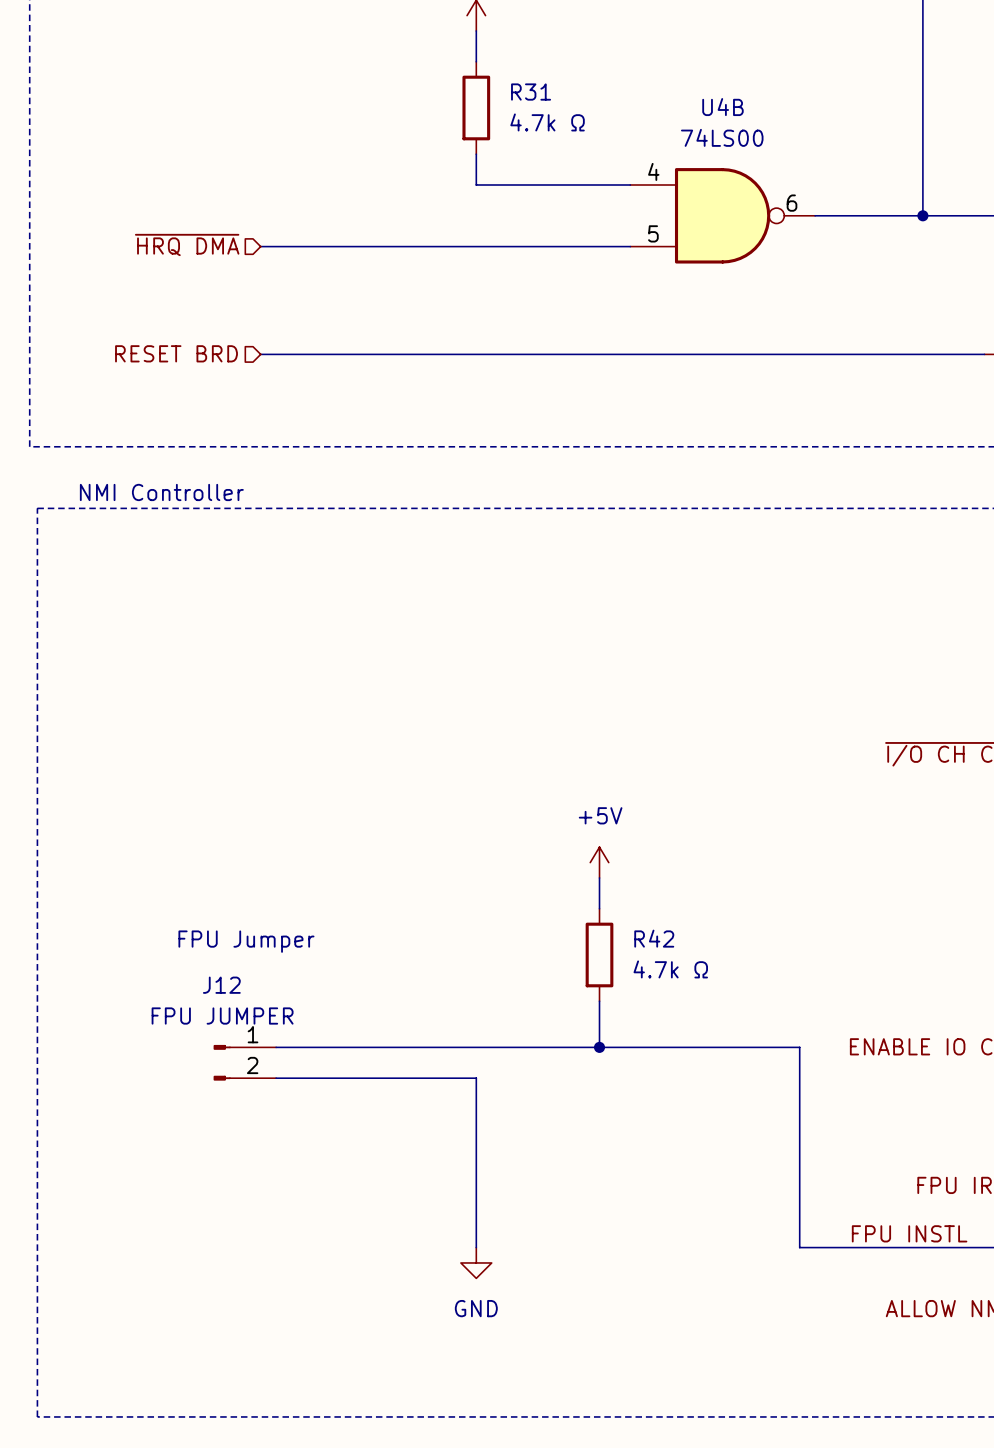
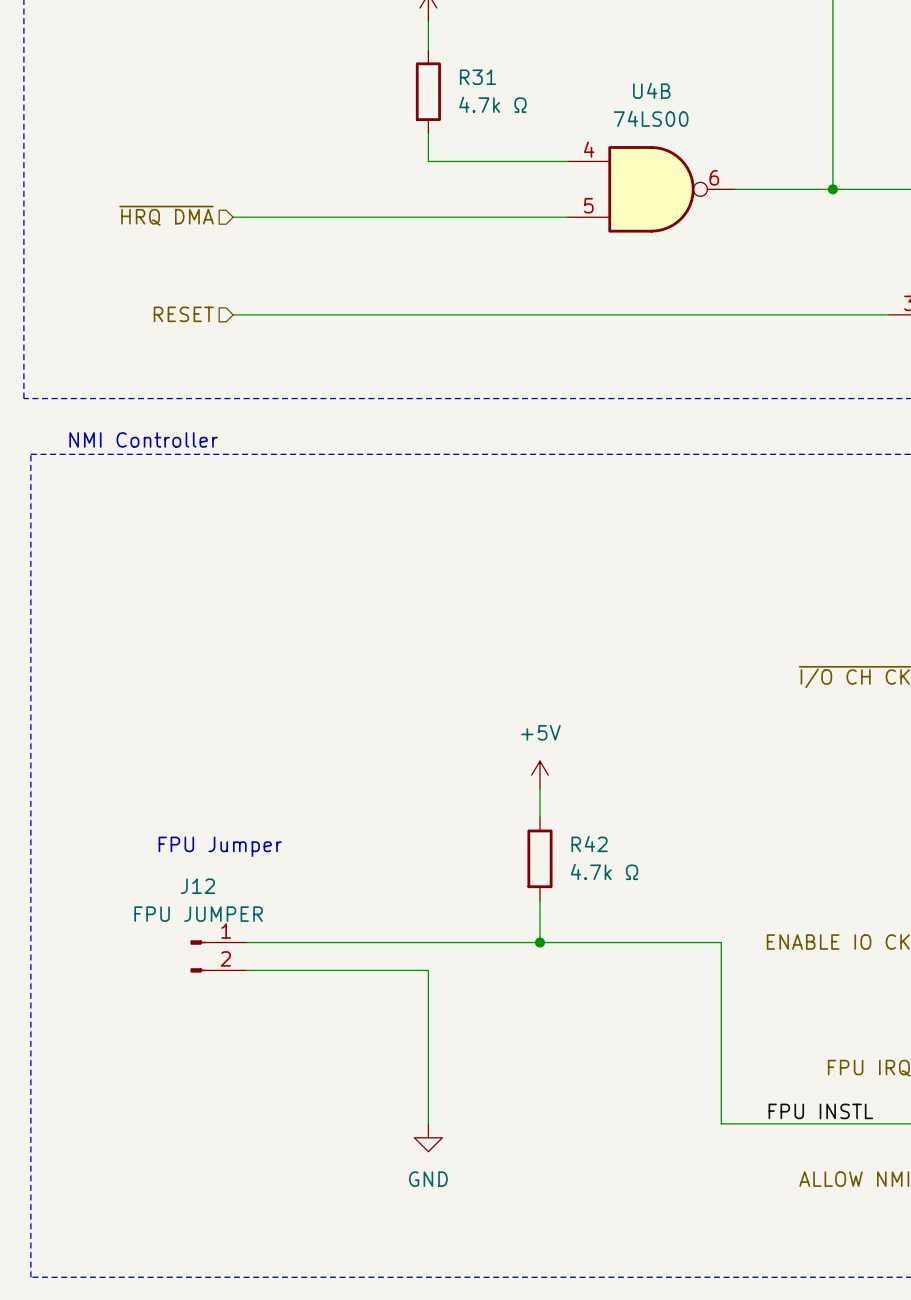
hierarchical label: RESET BRD (176, 353) -> RESET (183, 314)

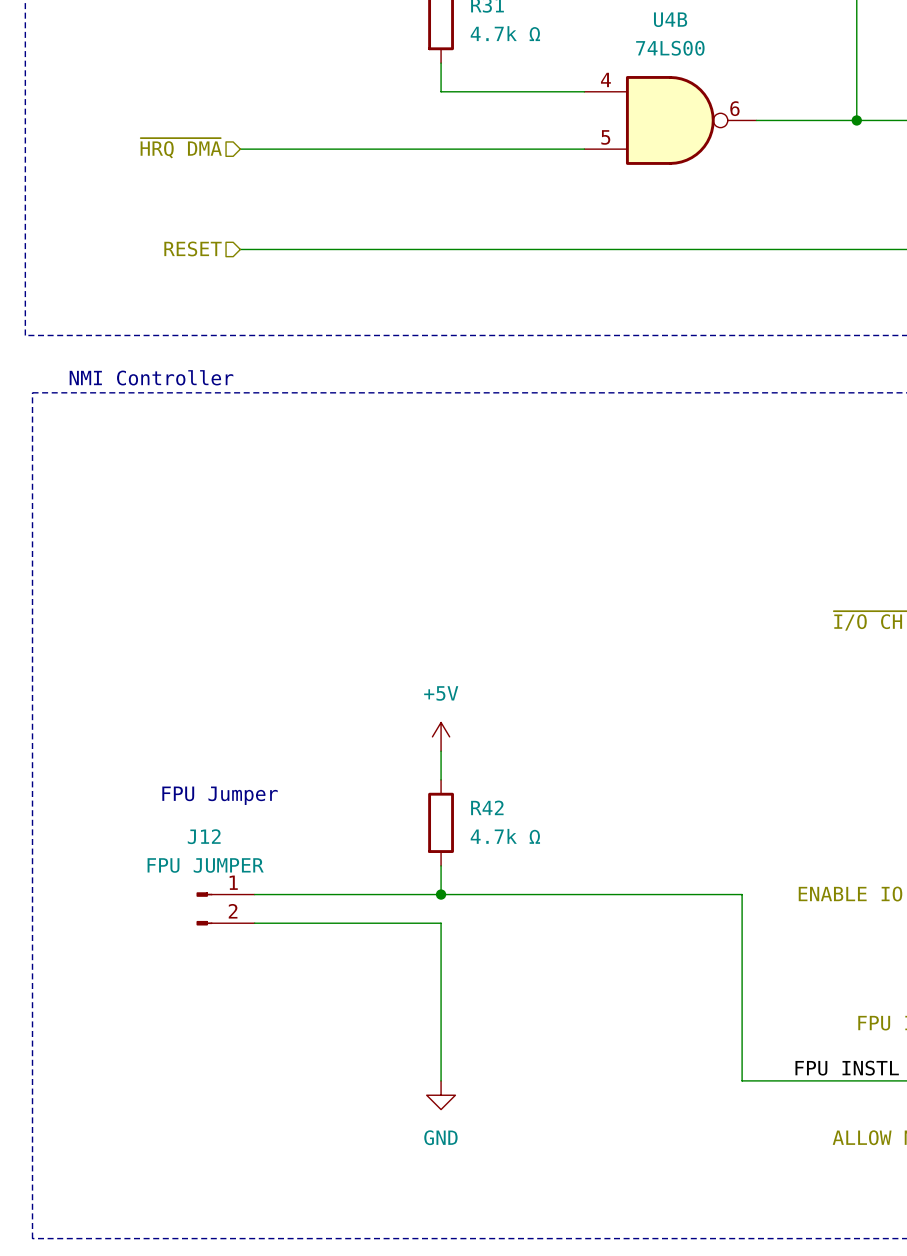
power symbol position: +5V (539, 775) -> +5V (441, 736)
wire: (539, 789) (539, 817) -> (441, 751) (441, 779)
R42 position: (539, 858) -> (441, 822)
wire: (539, 900) (539, 942) -> none
wire: none -> (441, 865) (441, 894)
junction: none -> (441, 894)
junction: (539, 942) -> none

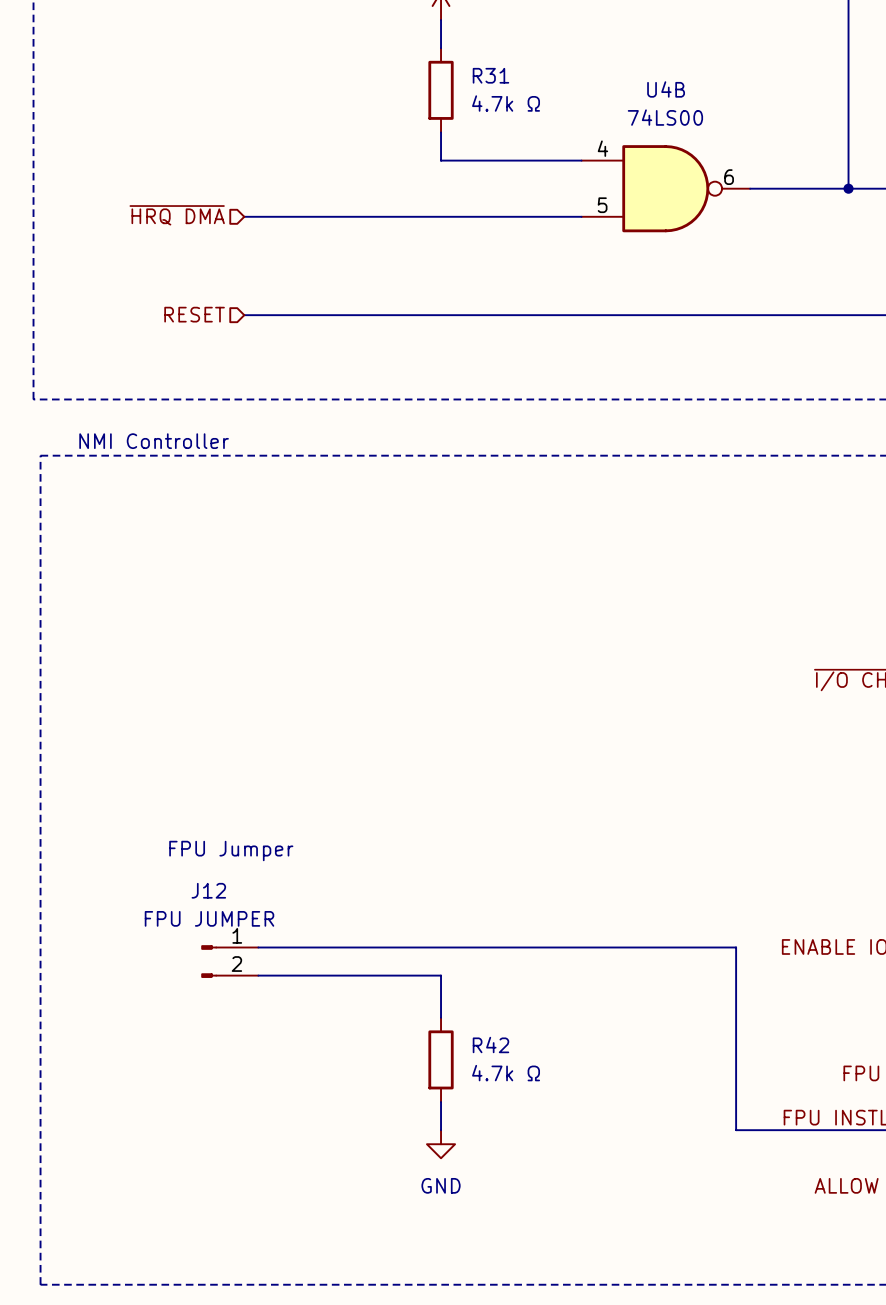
power symbol: +5V (441, 736) -> none
wire: (441, 751) (441, 779) -> none
R42 position: (441, 822) -> (441, 1059)
wire: (441, 865) (441, 894) -> none
junction: (441, 894) -> none
wire: (441, 966) (441, 1052) -> none

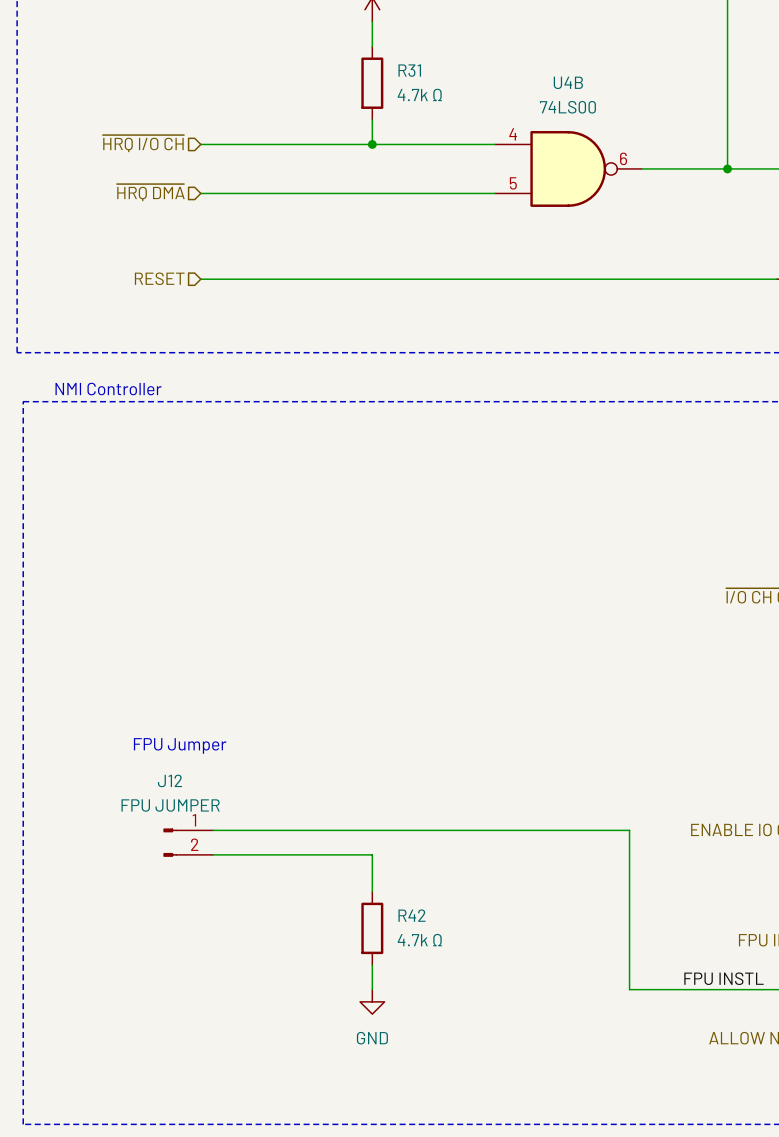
hierarchical label: none -> ~{HRQ I/O CH} (143, 143)
wire: none -> (200, 144) (372, 144)
junction: none -> (372, 144)

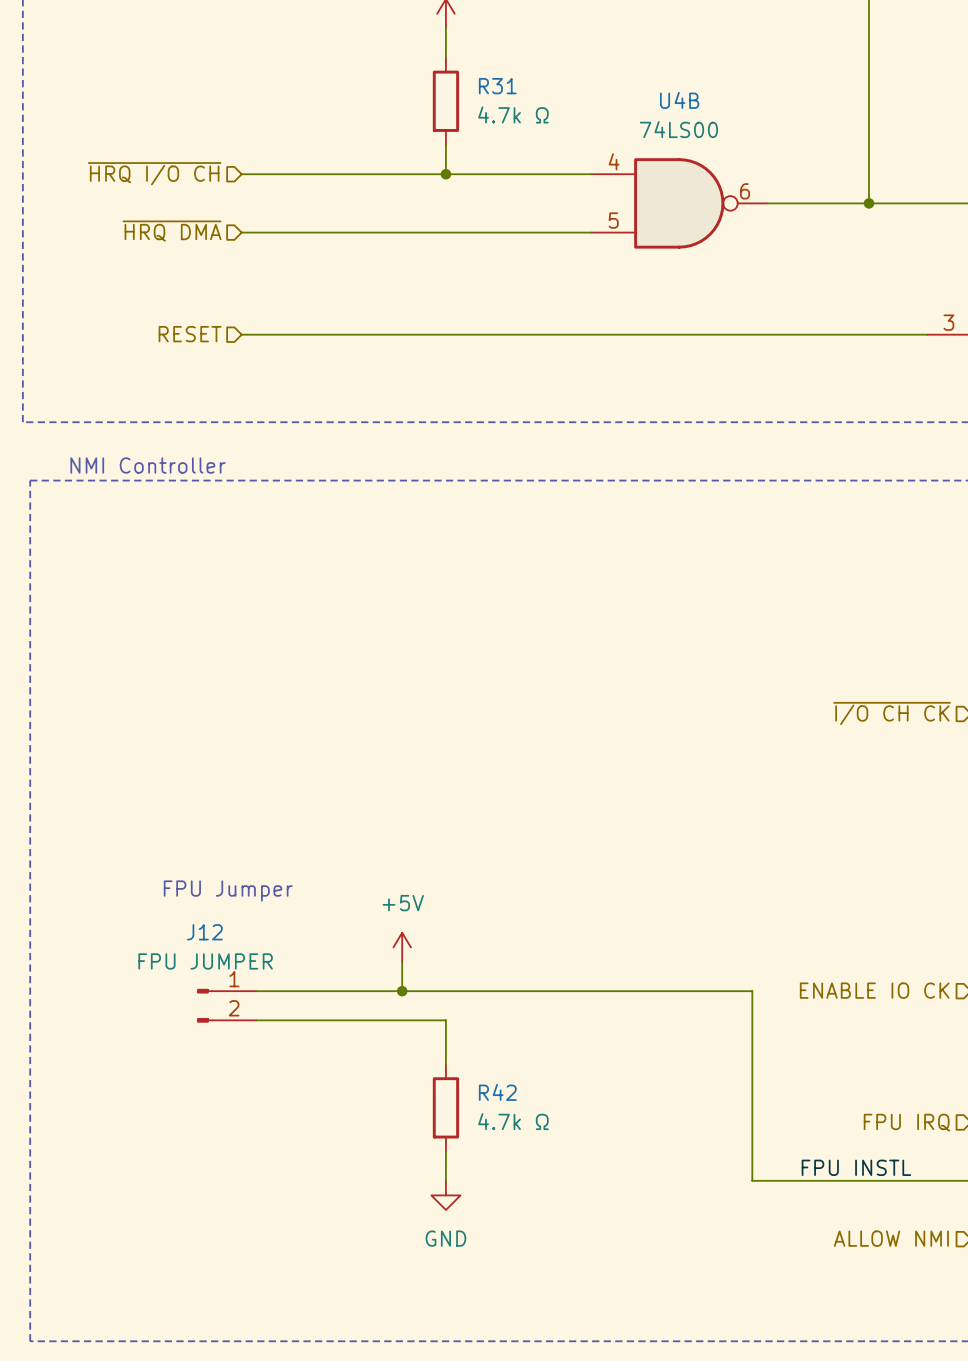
power symbol: none -> +5V (402, 947)
wire: none -> (402, 961) (402, 991)
junction: none -> (402, 991)

